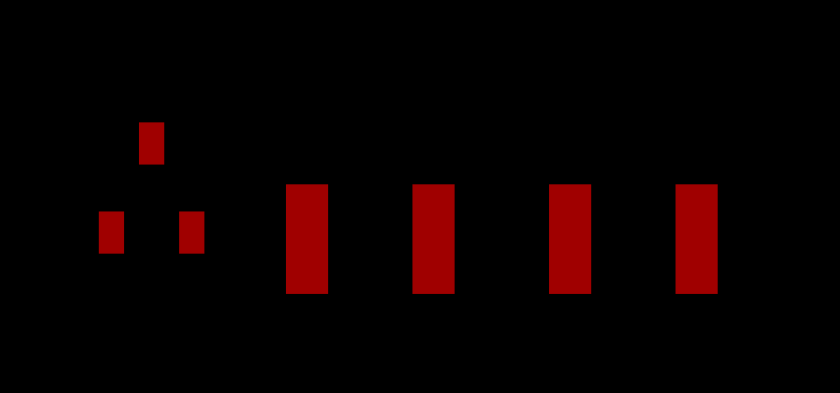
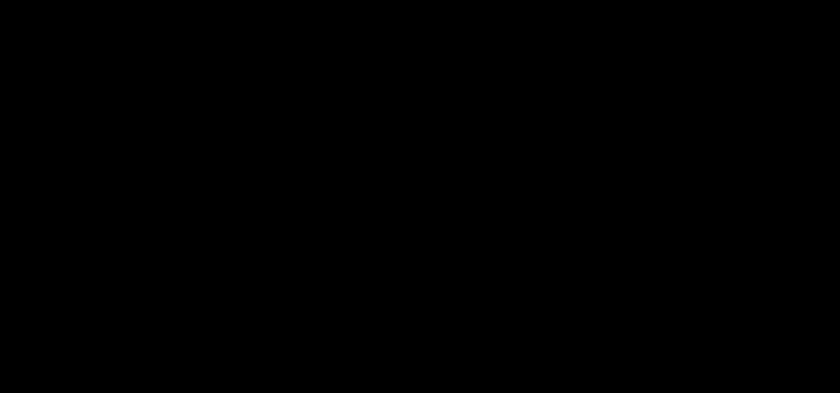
part: (151, 188) -> none
part: (370, 239) -> none
part: (633, 239) -> none

